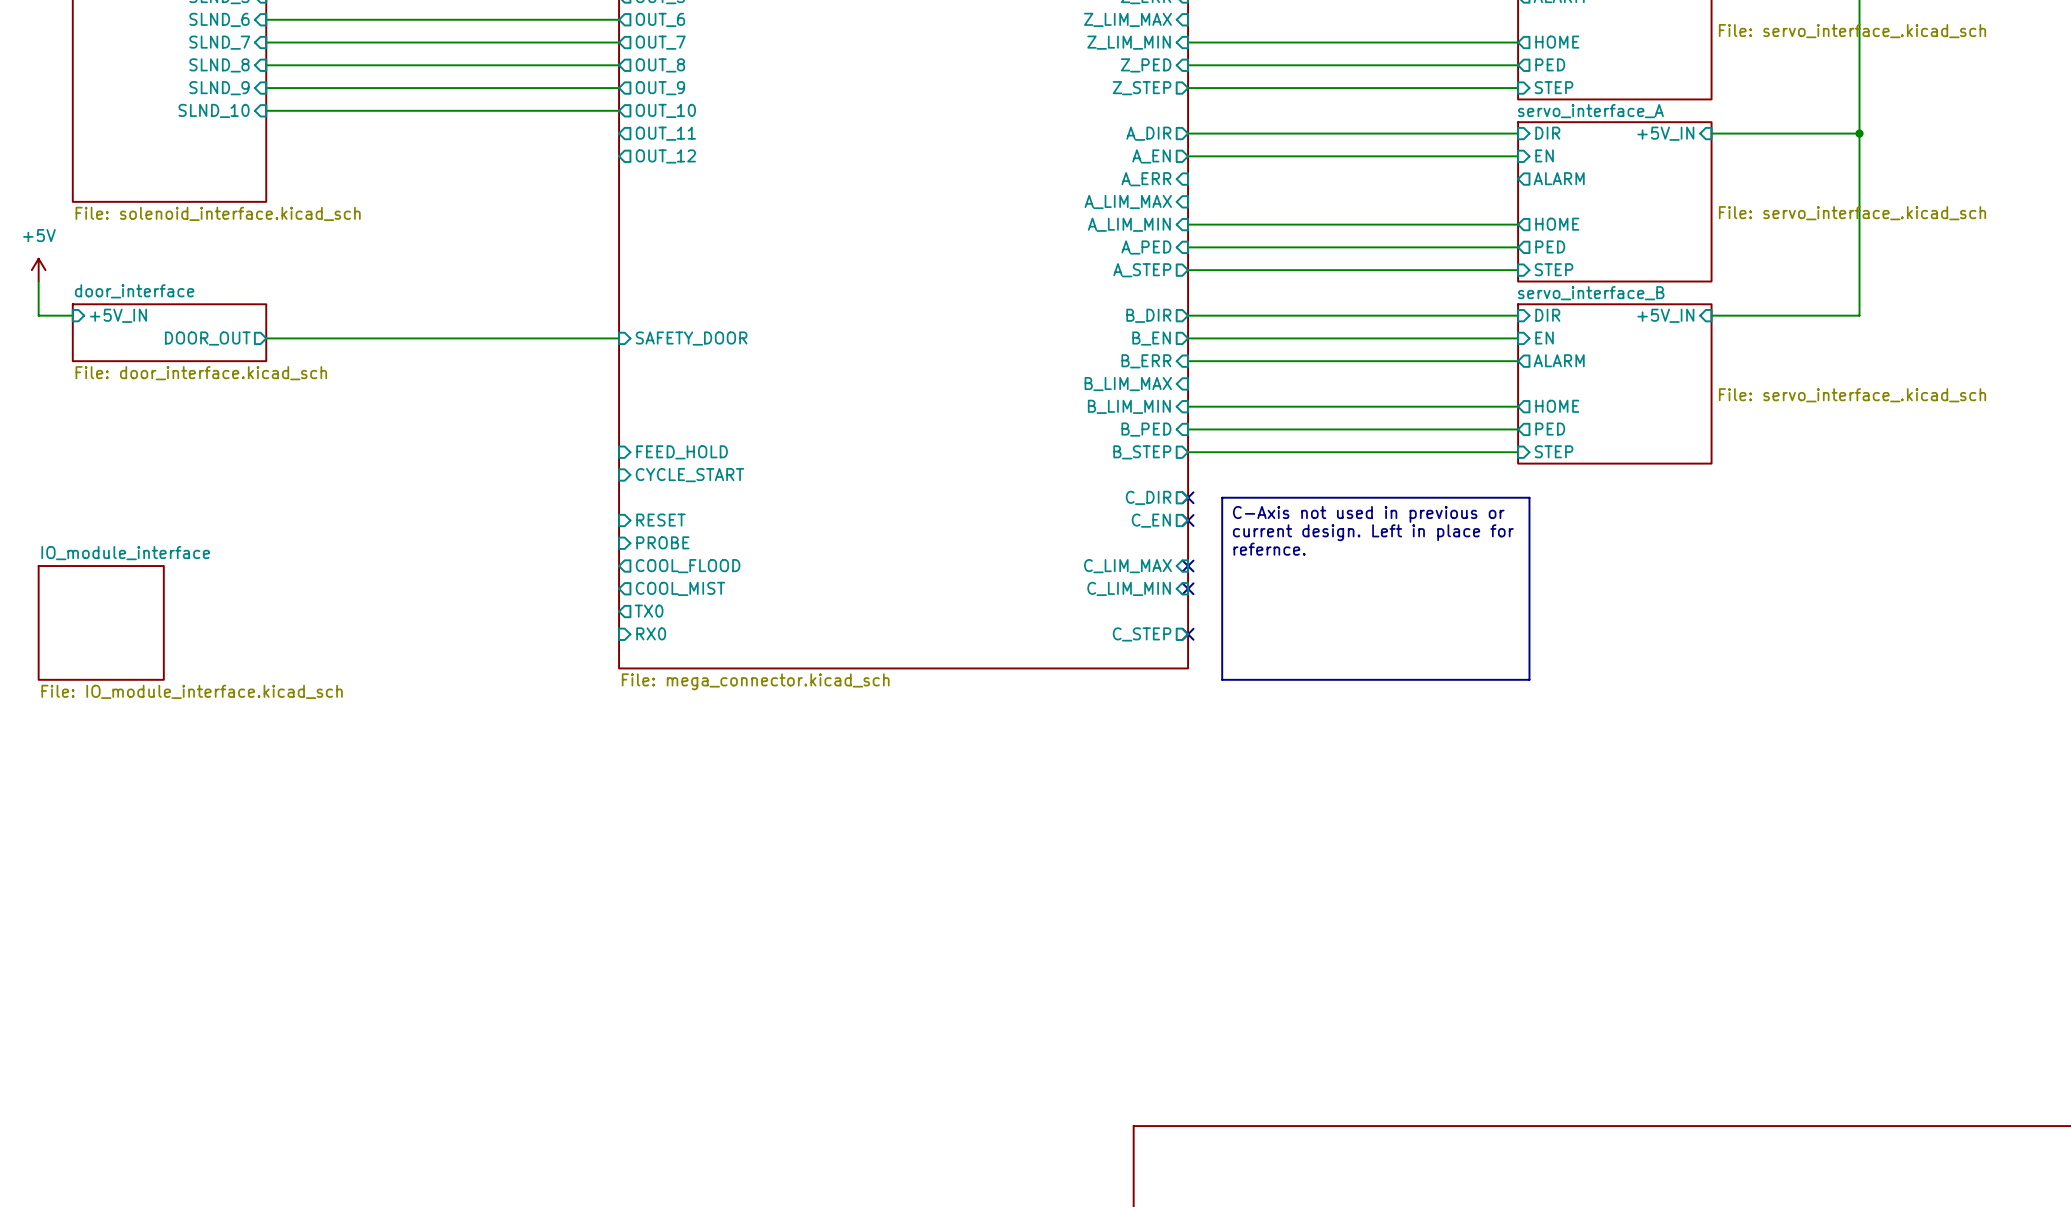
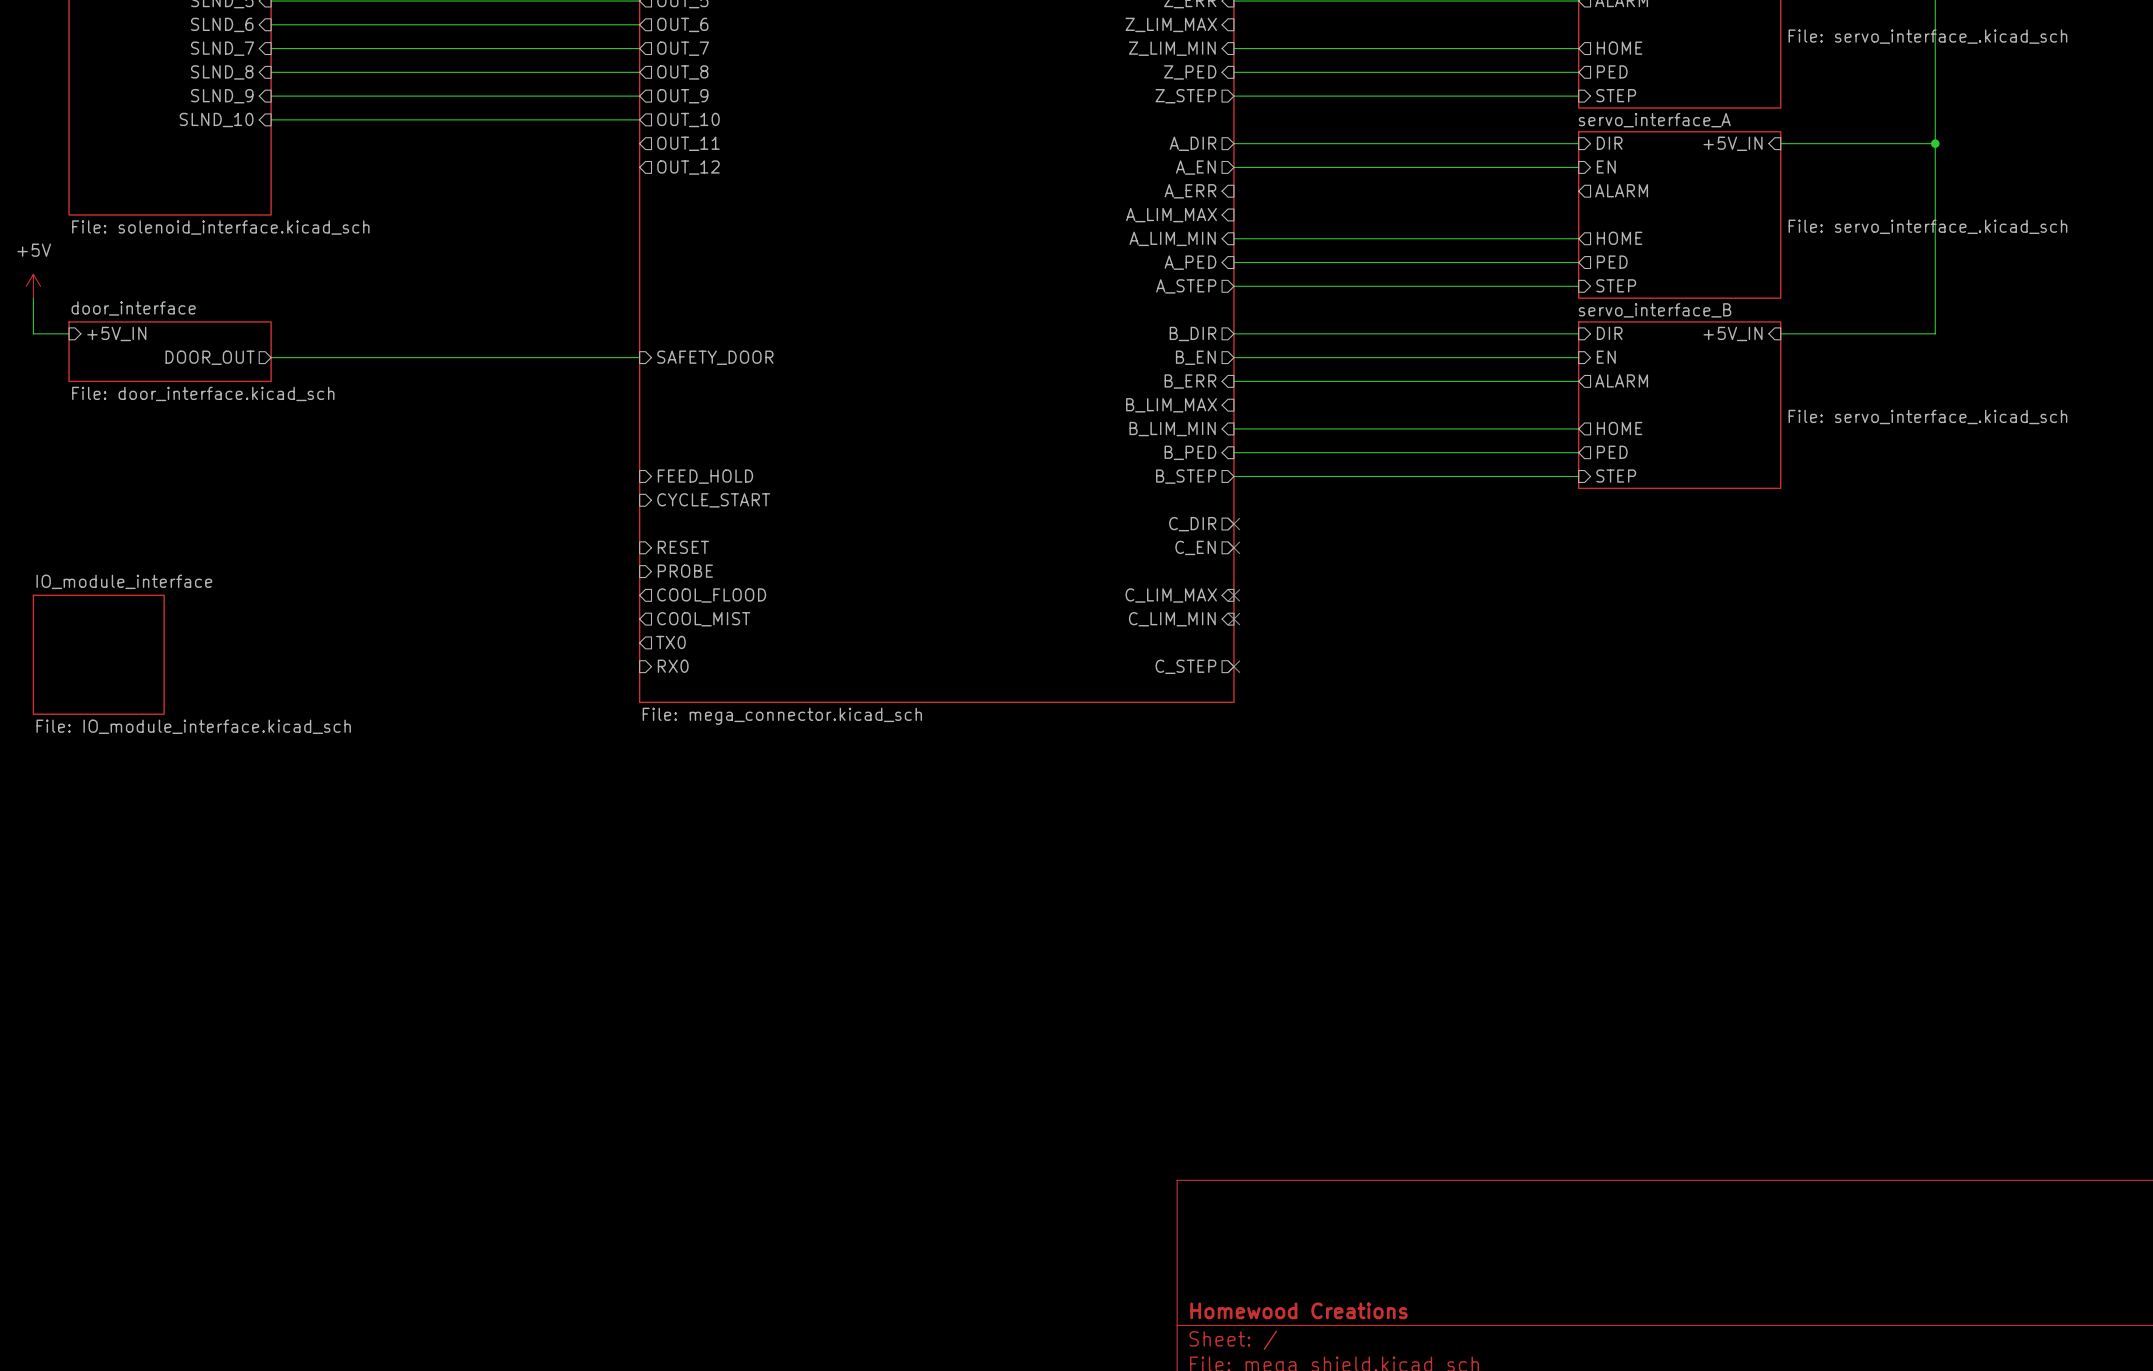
line: (1222, 497) (1529, 497) (1529, 679) (1222, 679) (1222, 497) -> none
text: C-Axis not used in previous or (1368, 514) -> none
text: current design. Left in place for (1373, 532) -> none
text: refernce. (1269, 549) -> none

